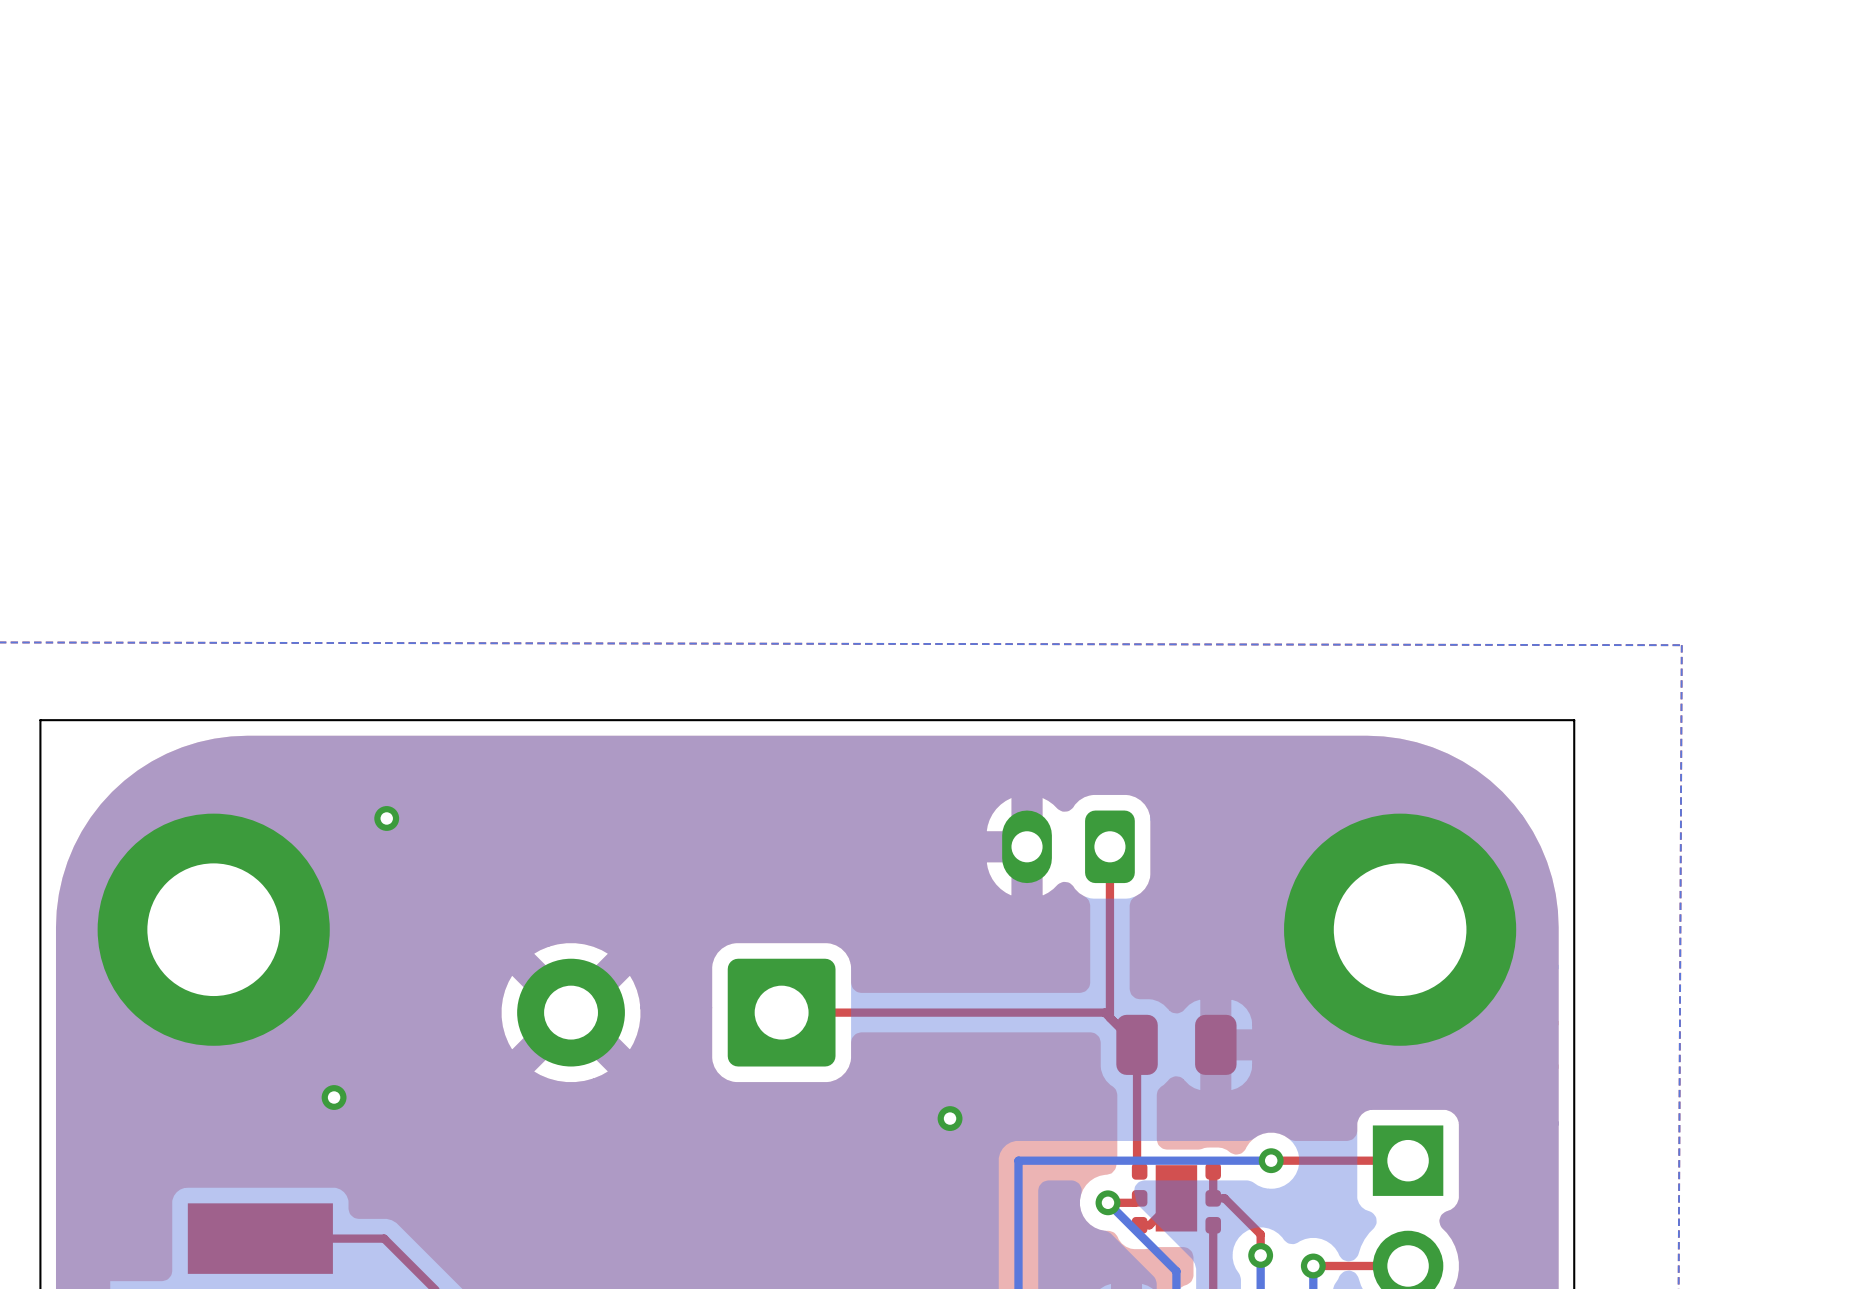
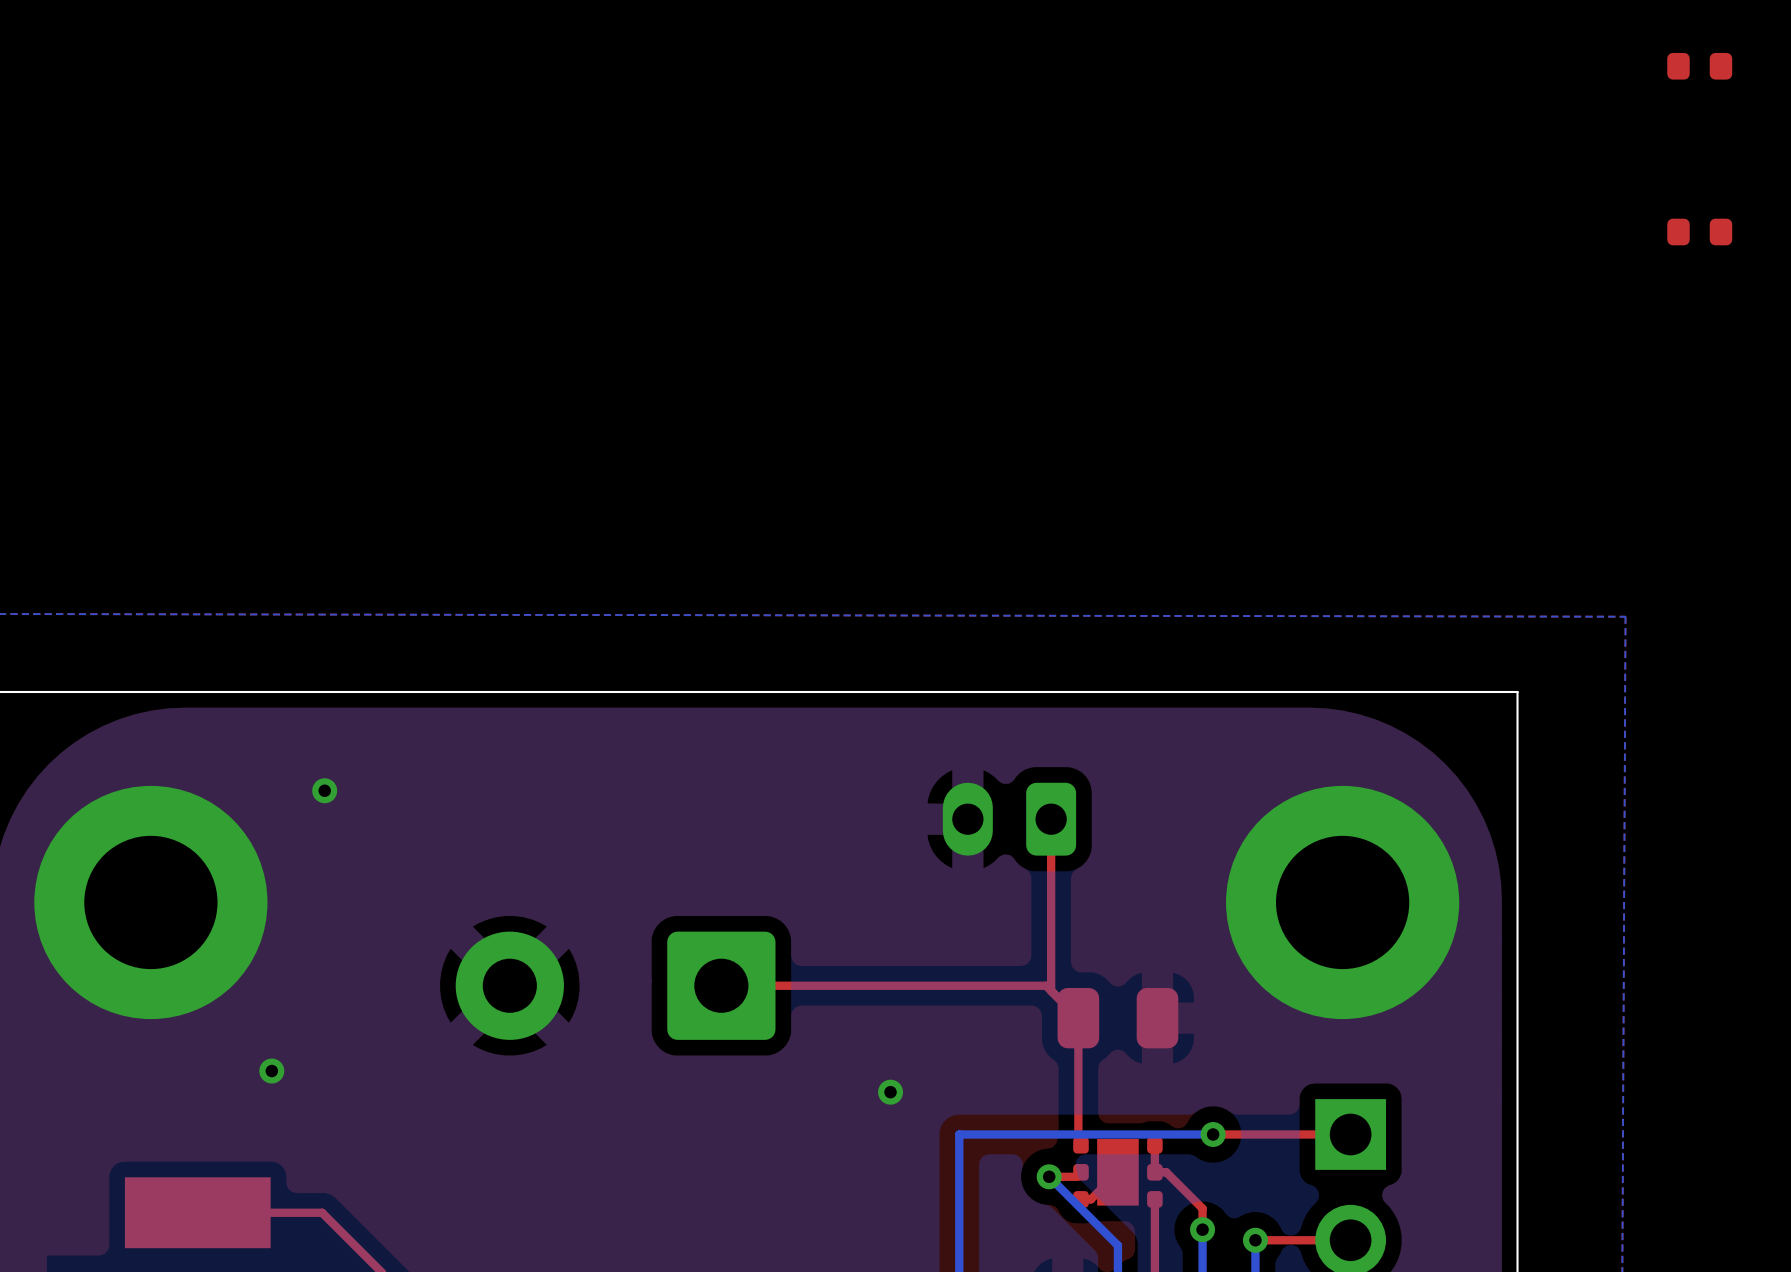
part: none -> (1699, 66)
part: none -> (1699, 231)

